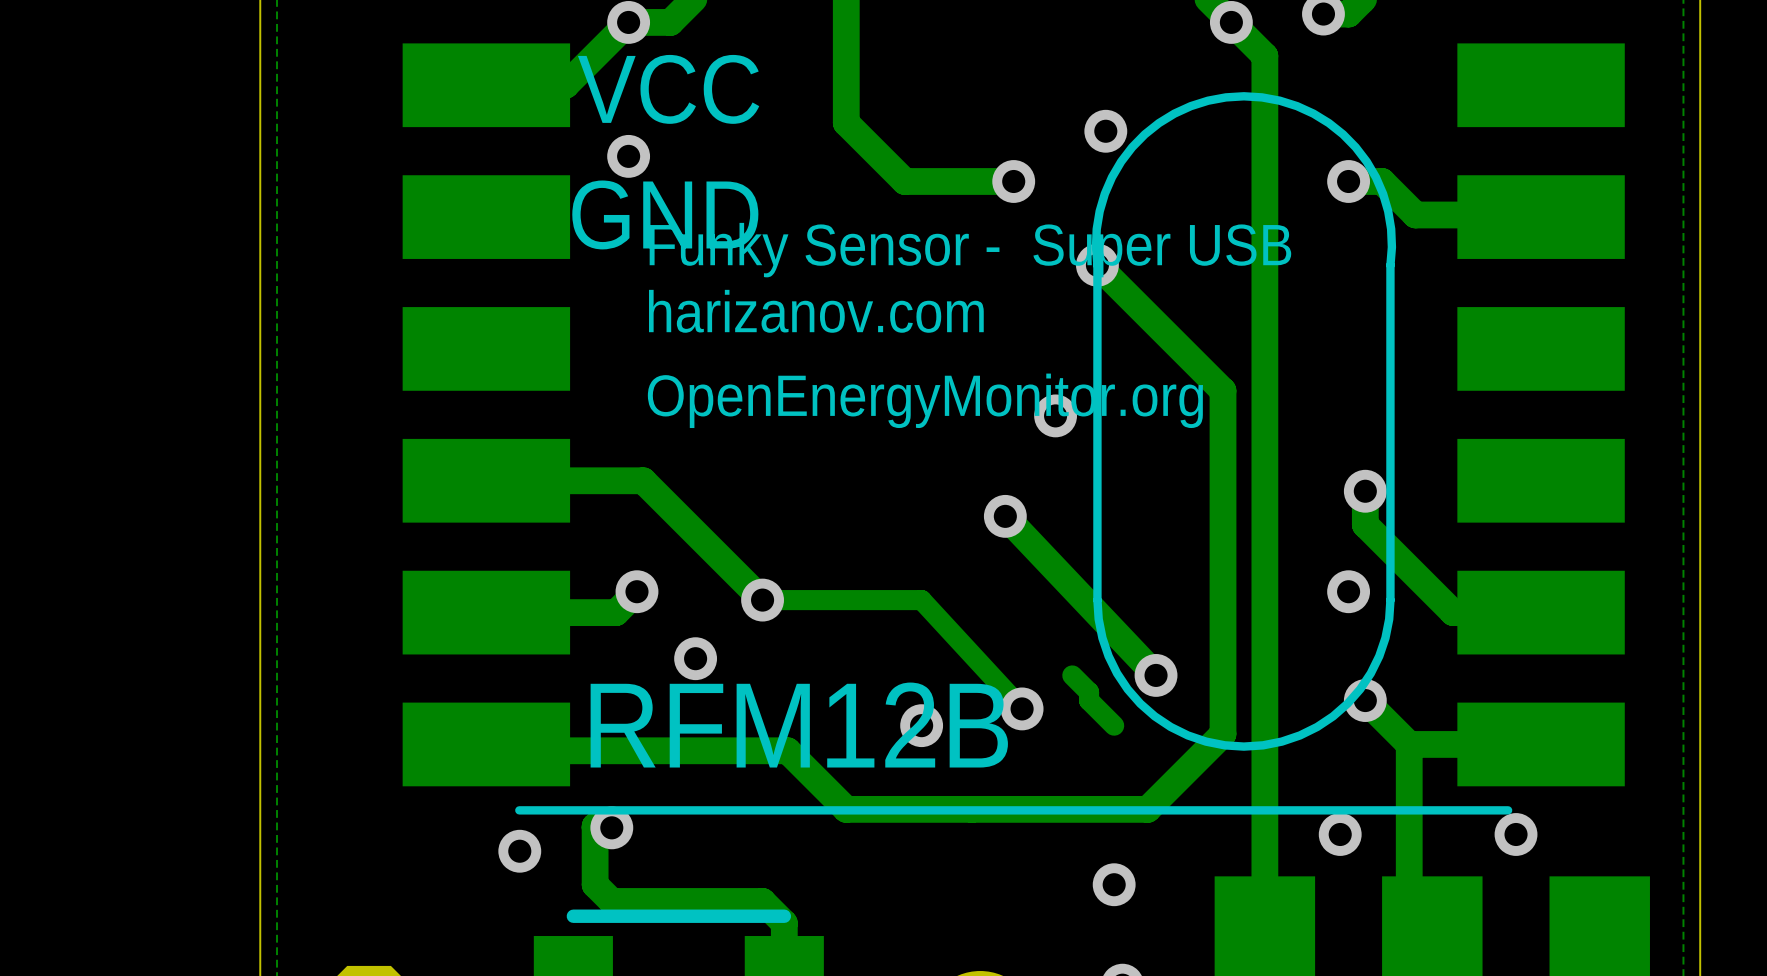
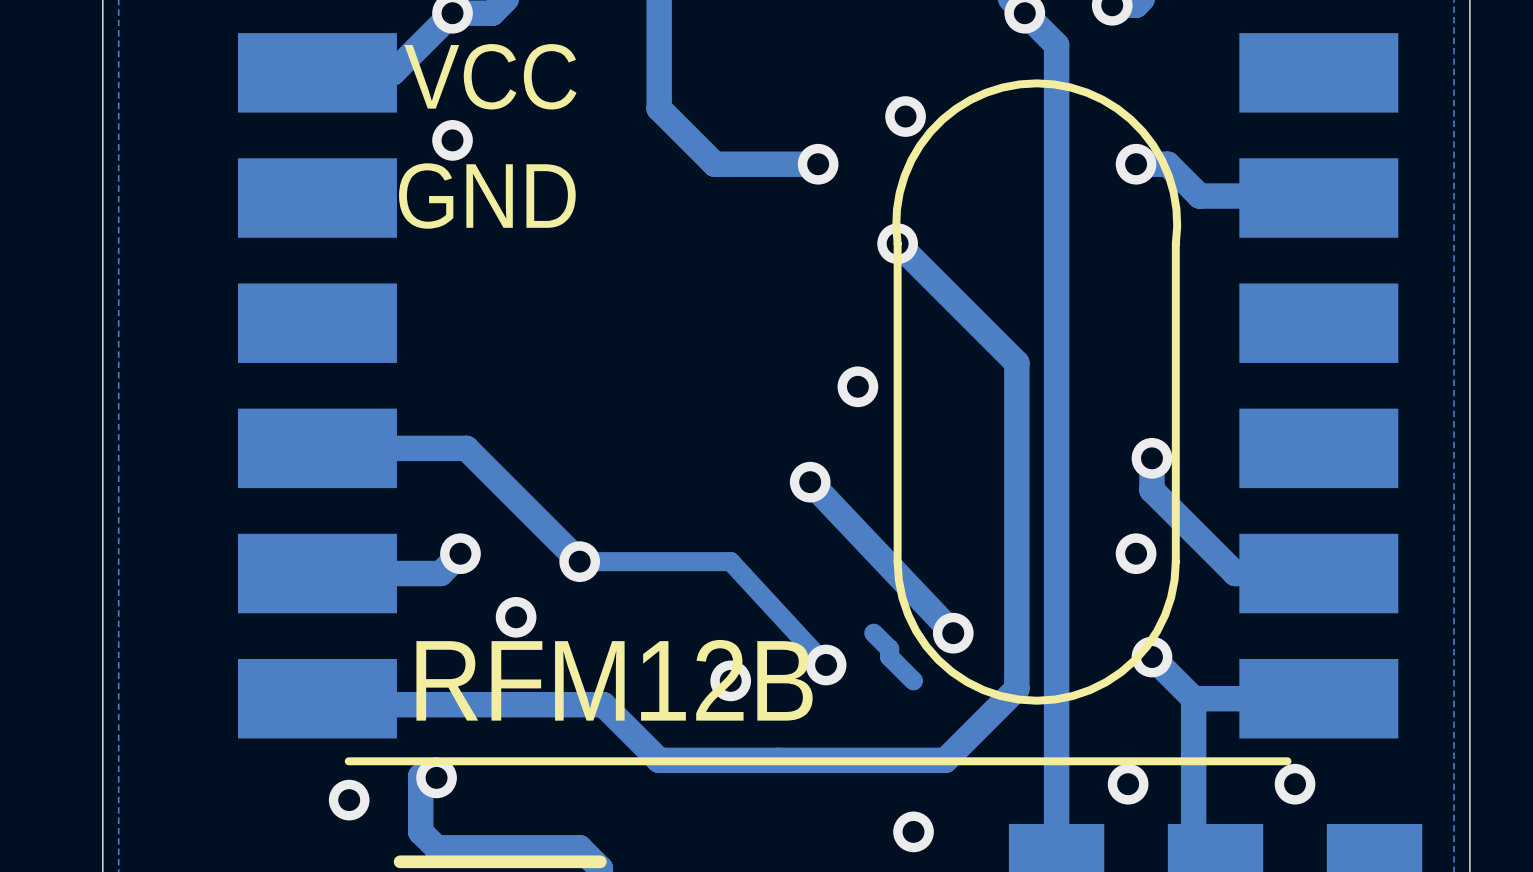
text: Funky Sensor - Super USB (970, 250) -> none
text: harizanov.com (816, 311) -> none
text: OpenEnergyMonitor.org (925, 400) -> none

